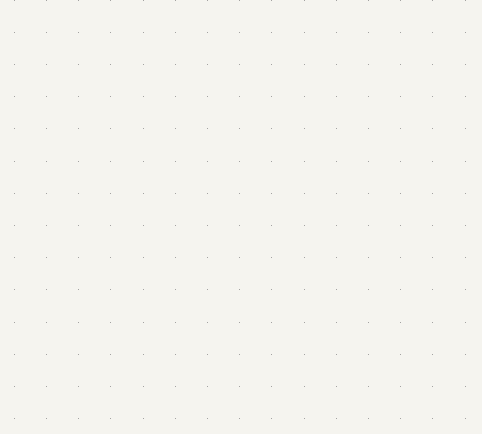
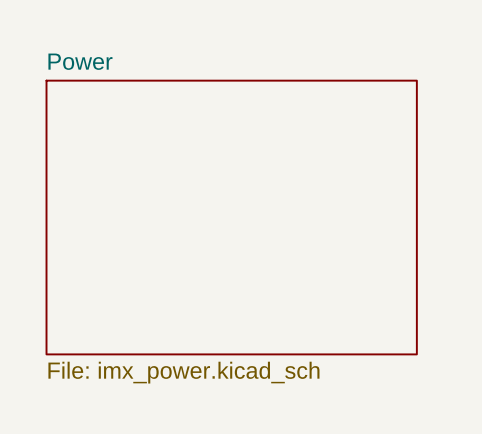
sheet Power: none -> File: imx_power.kicad_sch (231, 217)

